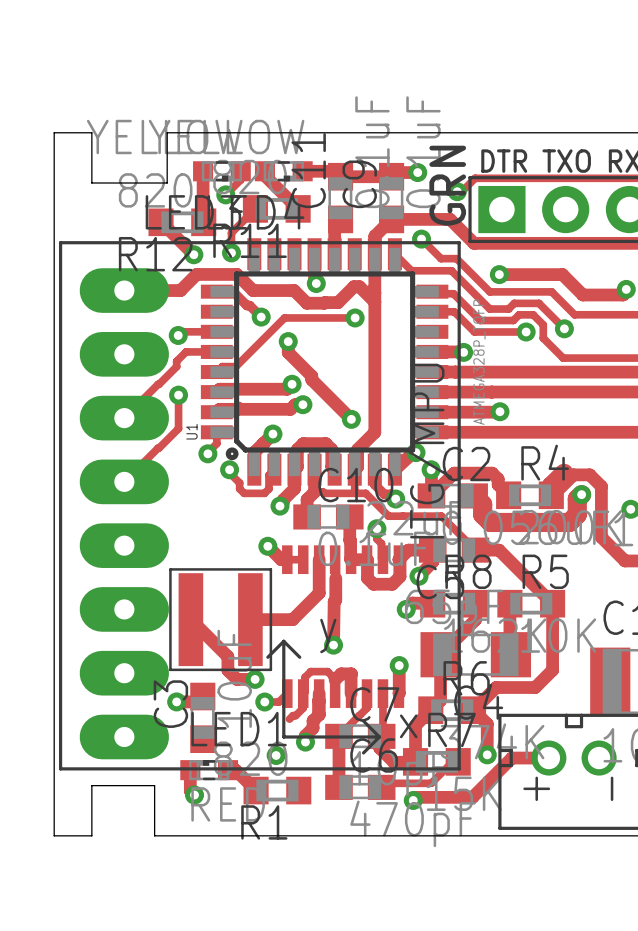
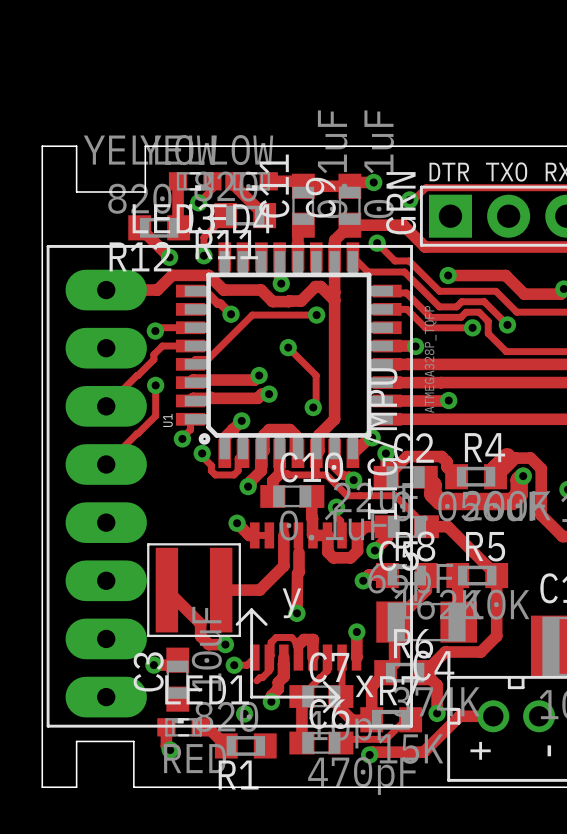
track: (288, 341) (288, 352) (311, 376) (311, 379) (351, 419) -> none
via position: (288, 341) -> (288, 347)
track: none -> (288, 347) (316, 375) (316, 405)

